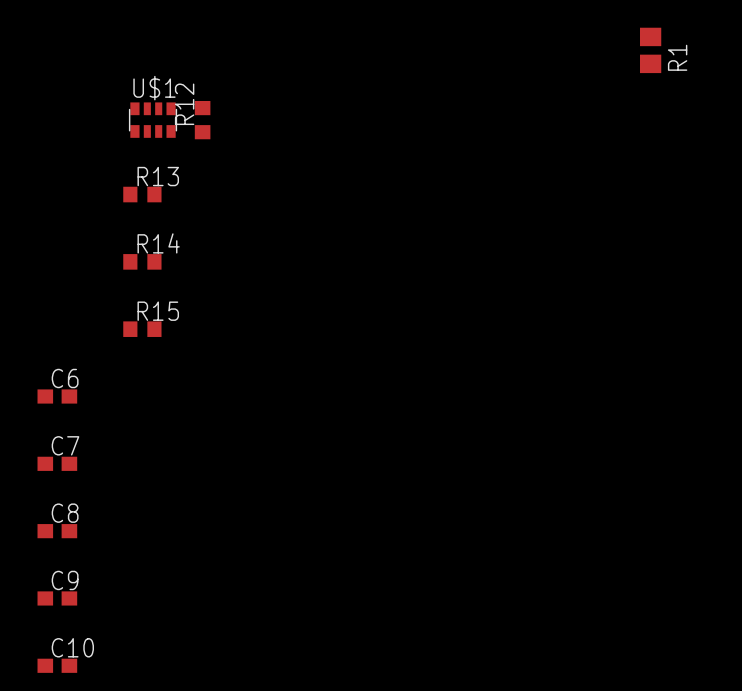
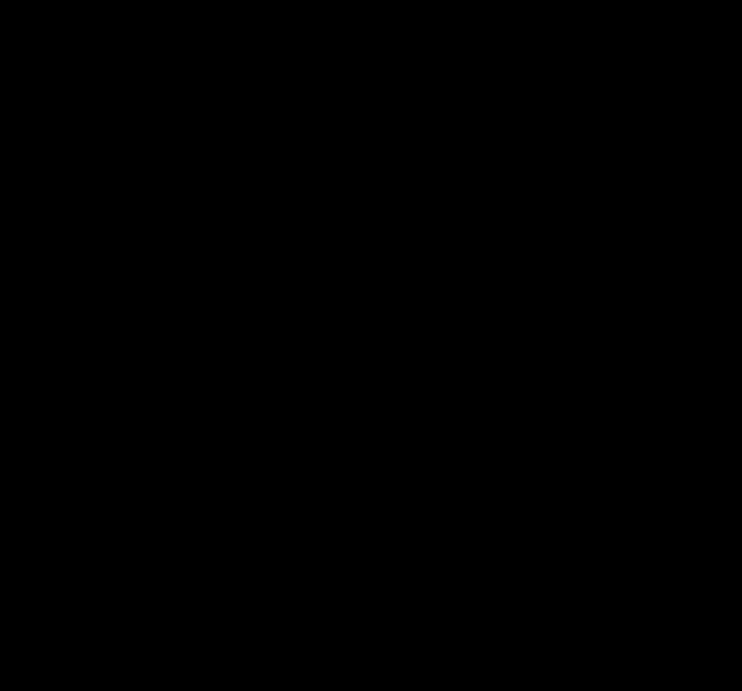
R1: (650, 50) -> none
U$1: (153, 120) -> none
R12: (202, 120) -> none
R13: (142, 194) -> none
R14: (142, 261) -> none
R15: (142, 329) -> none
C6: (57, 396) -> none
C7: (57, 463) -> none
C8: (57, 531) -> none
C9: (57, 598) -> none
C10: (57, 665) -> none

